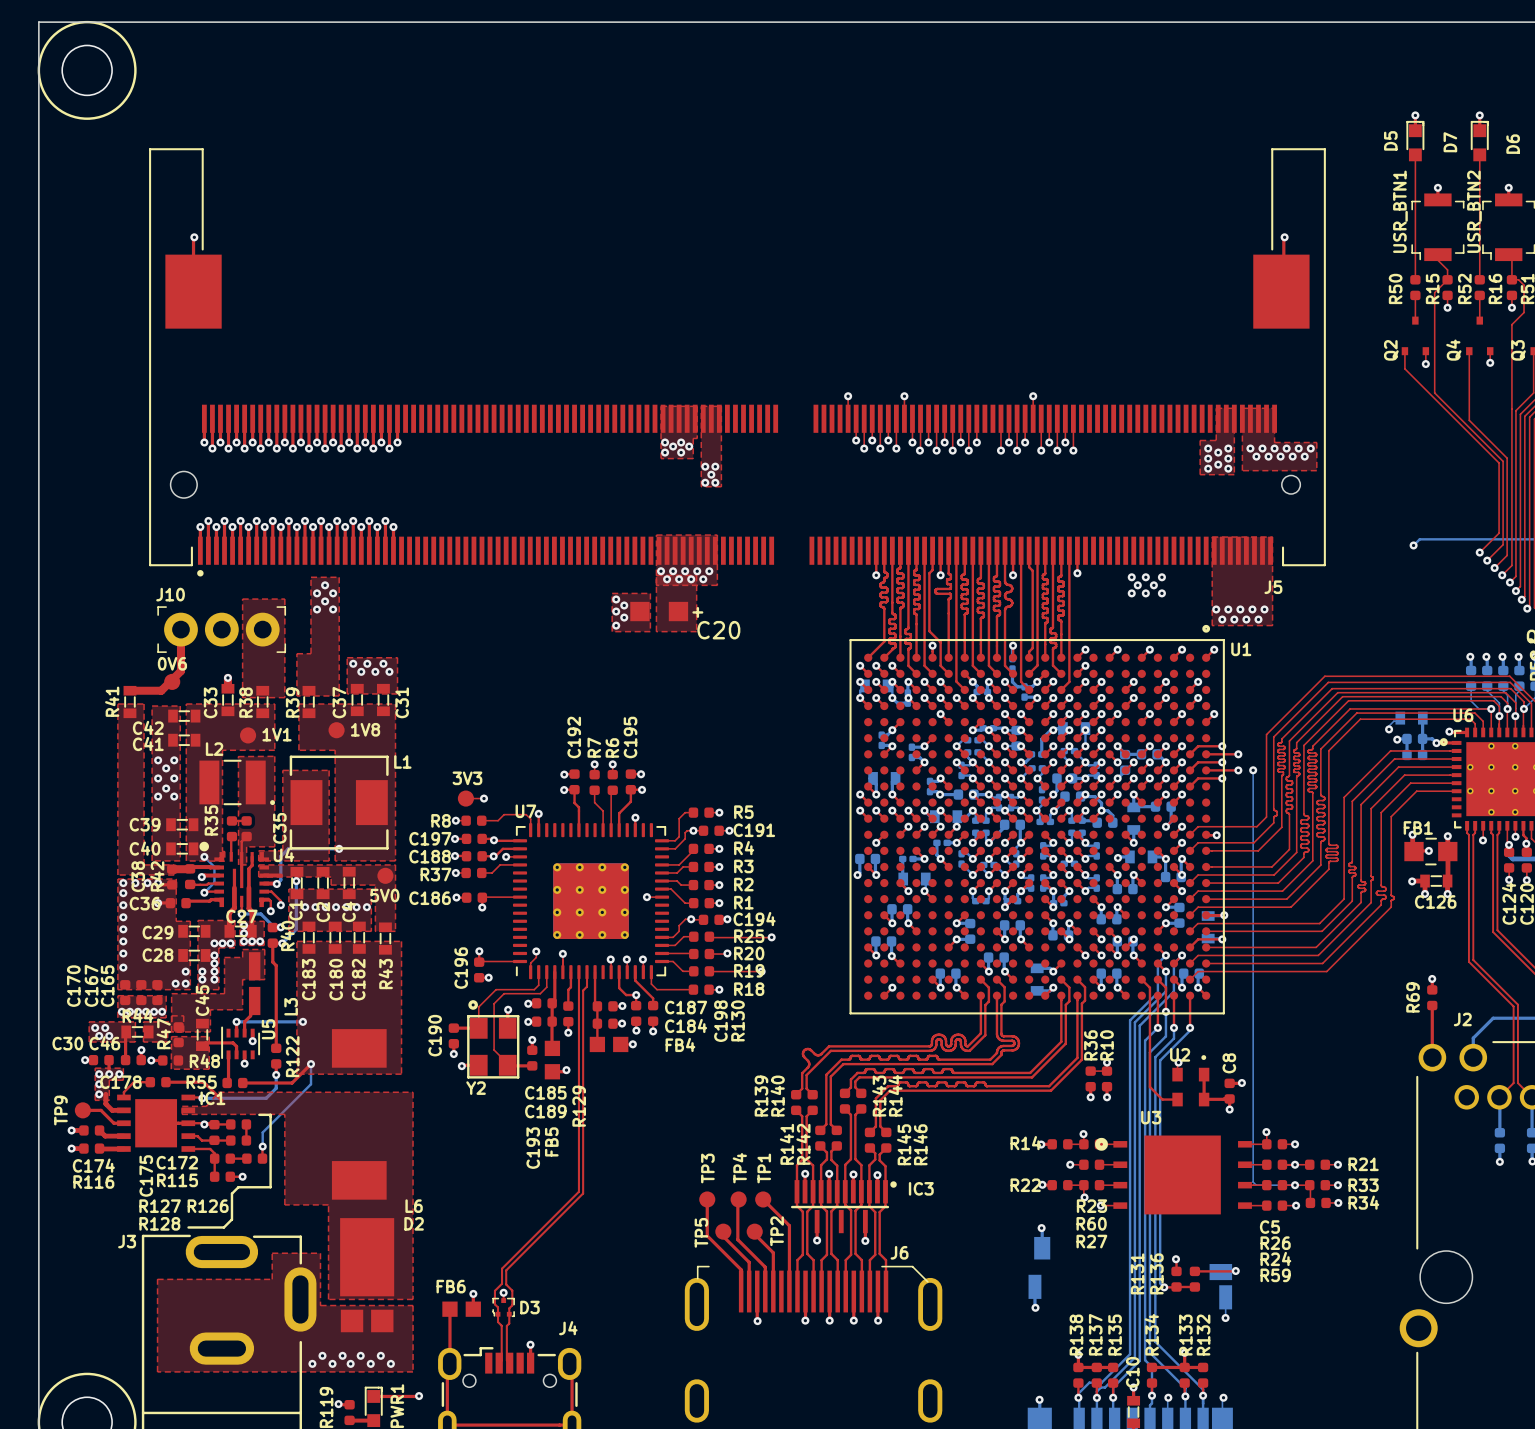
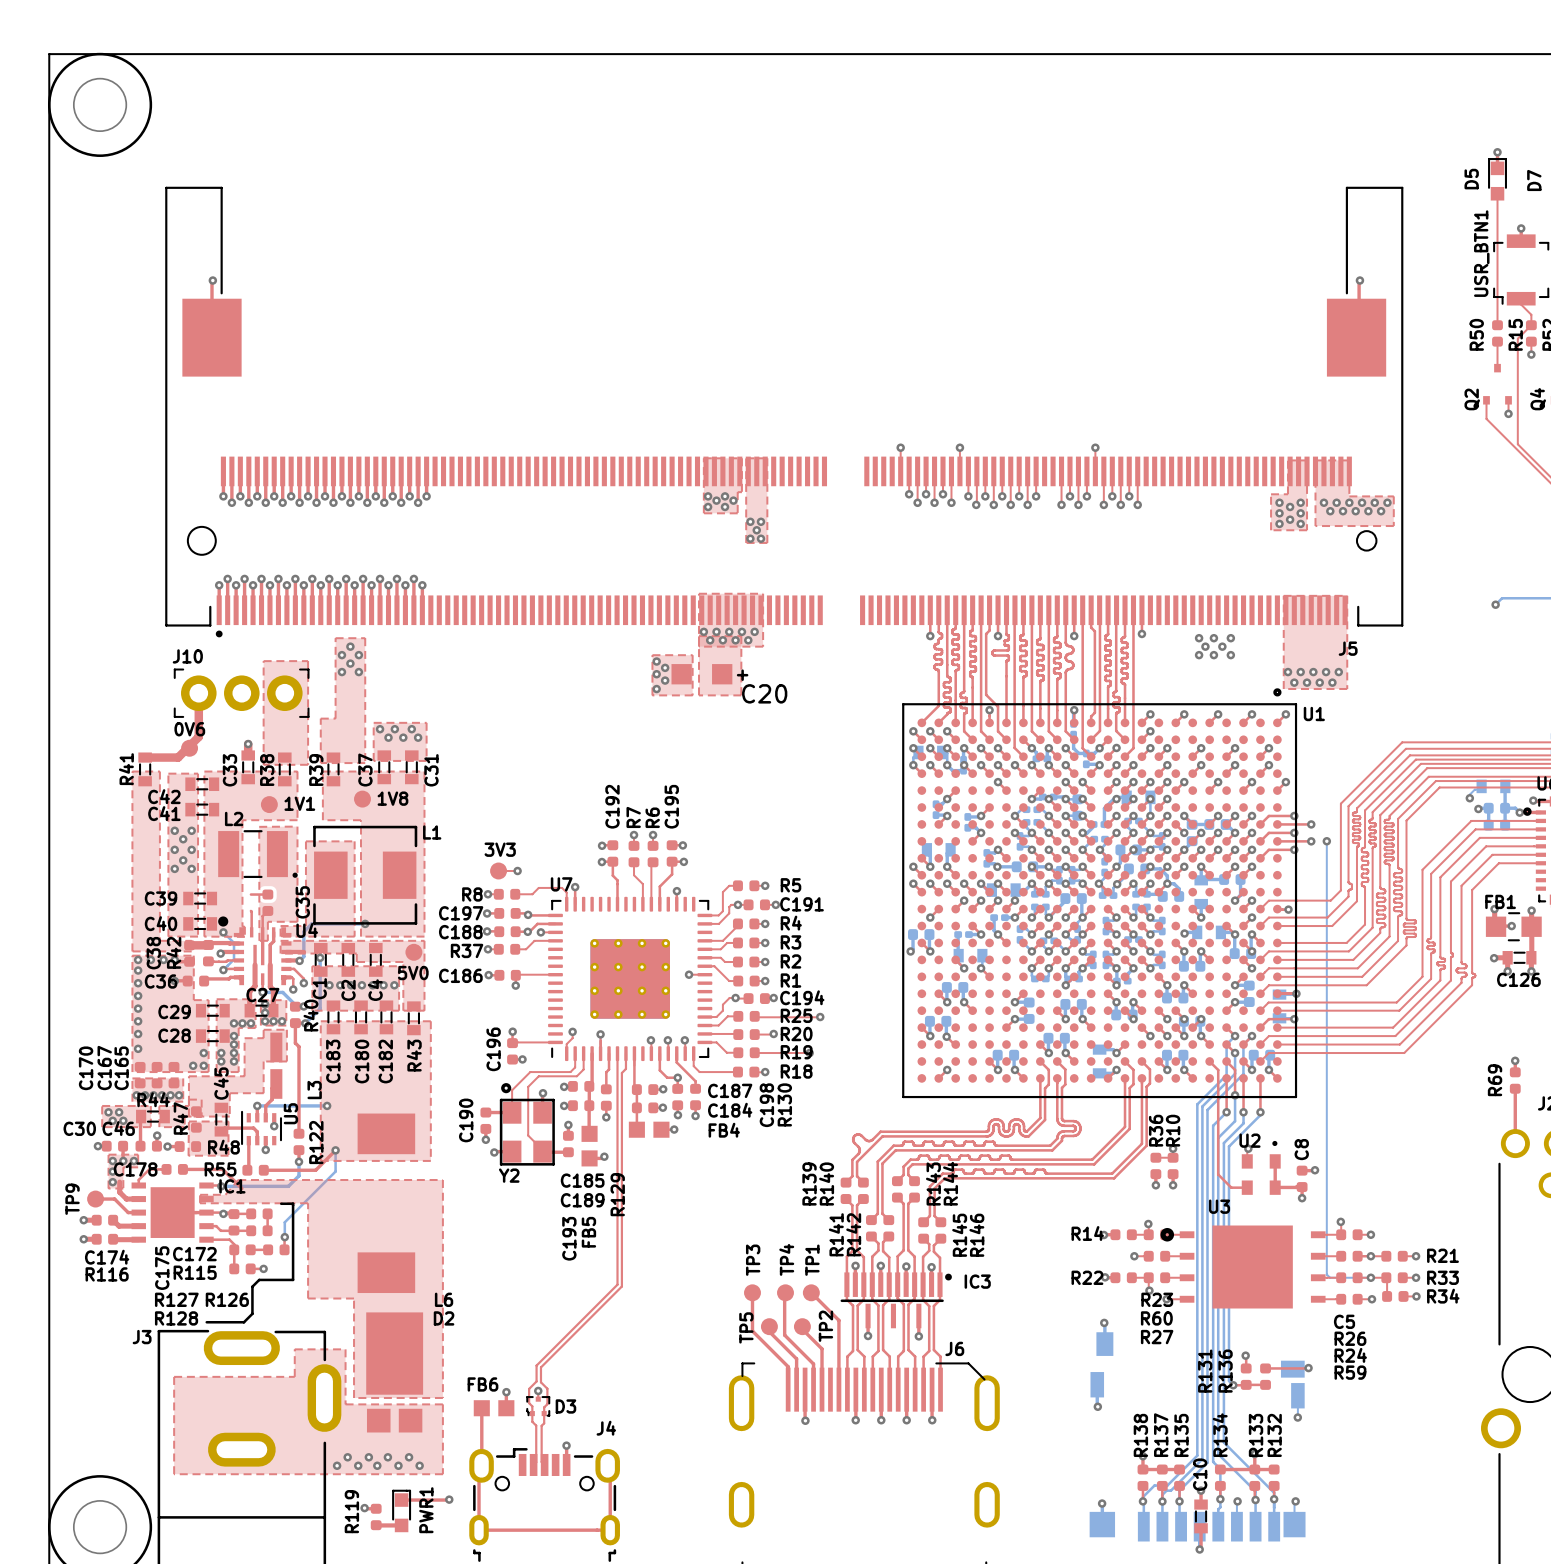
R35: (231, 828) -> none

